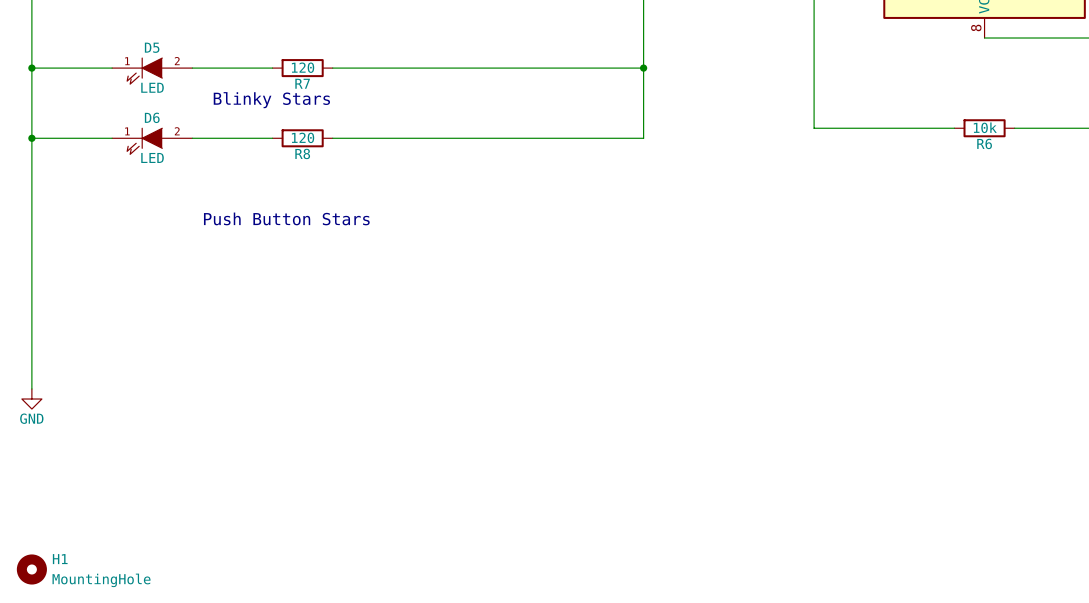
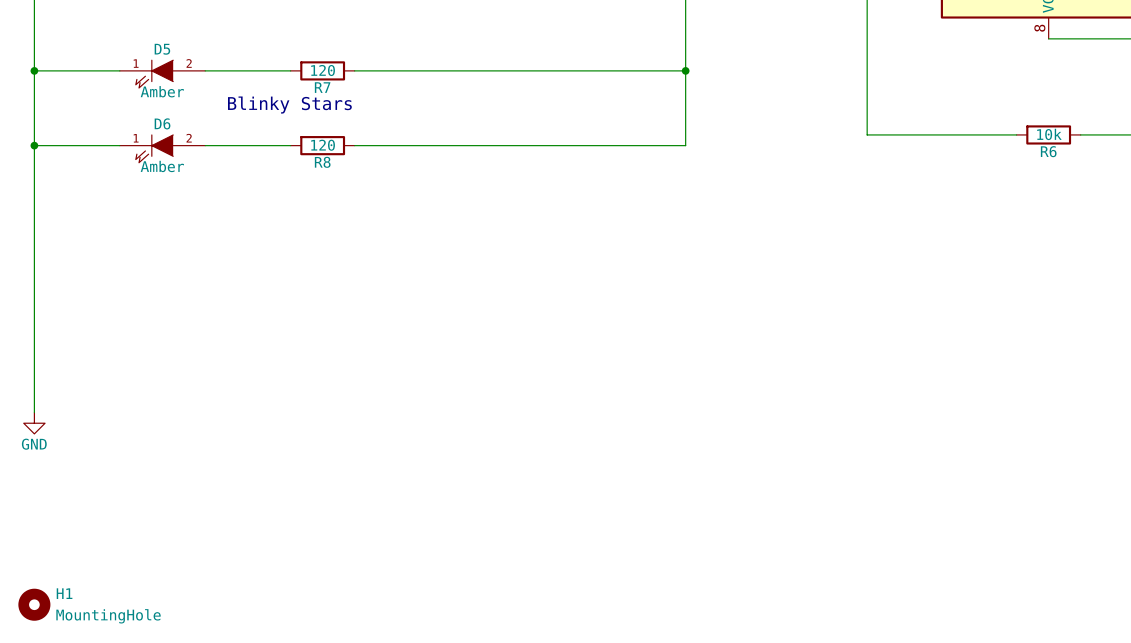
D5 value: LED (152, 87) -> Amber (162, 91)
D6 value: LED (152, 157) -> Amber (162, 166)
text: Push Button Stars (286, 218) -> none

